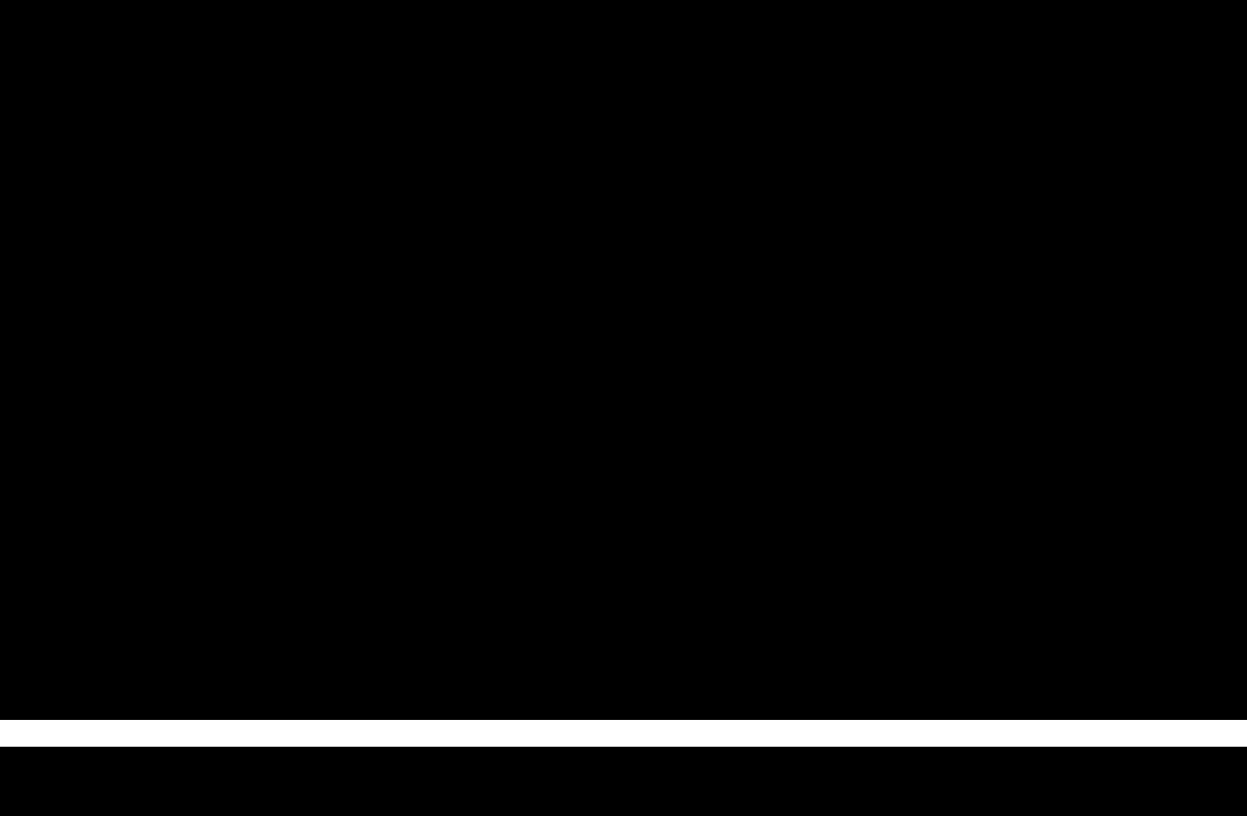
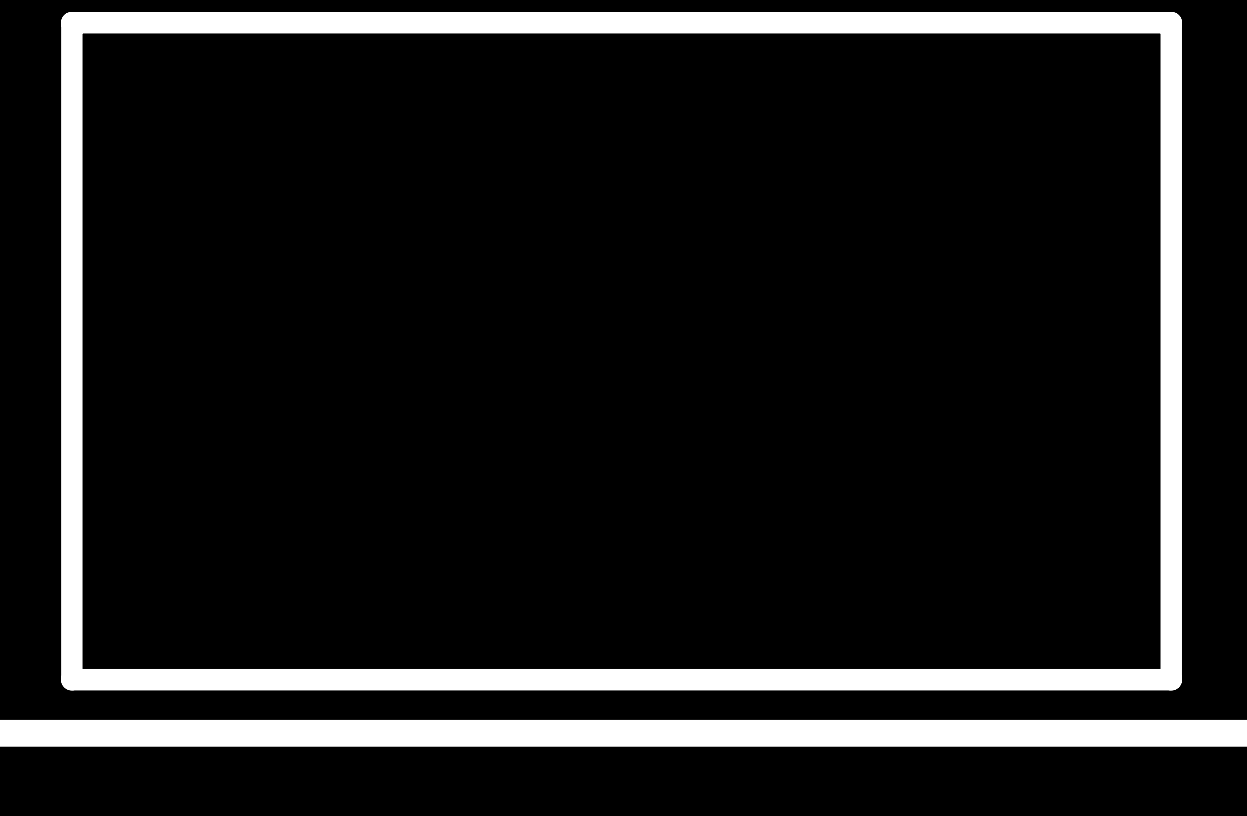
board edge: none -> (71, 22) (71, 679) (1171, 679) (1171, 22) (71, 22)

